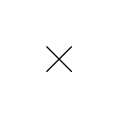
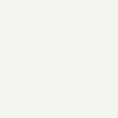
no-connect mark: (59, 59) -> none

